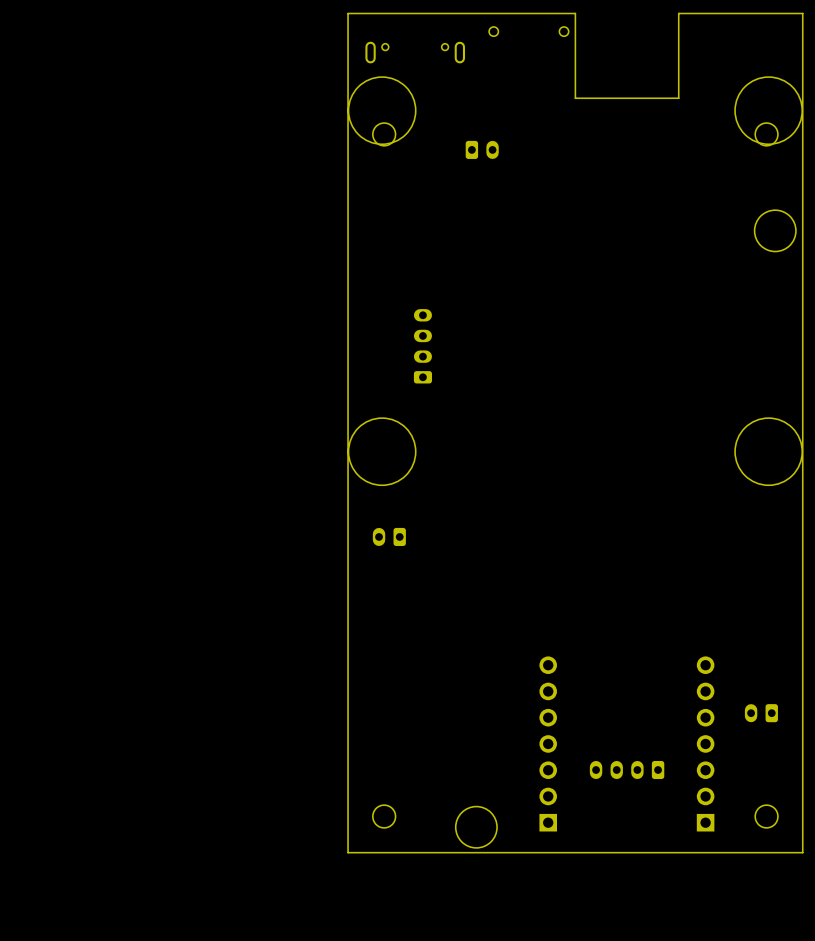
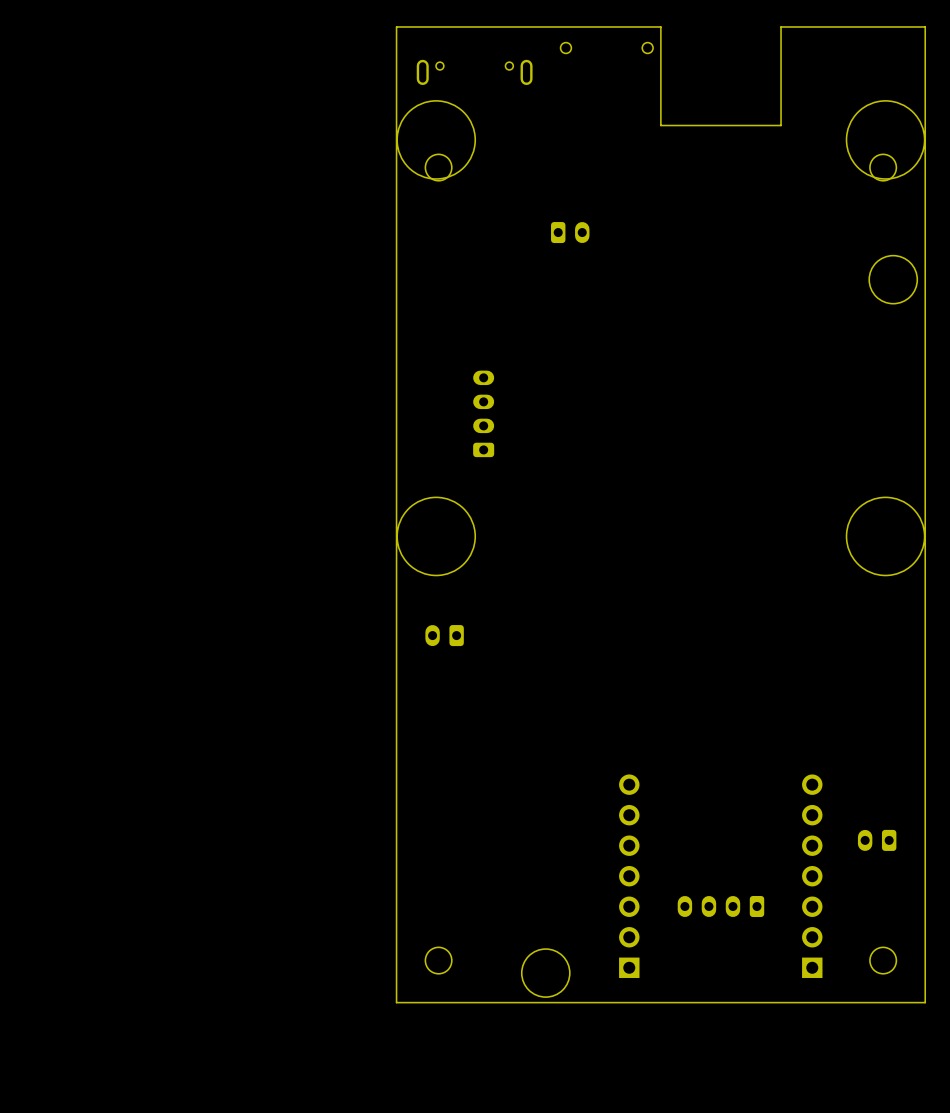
part position: (482, 149) -> (570, 232)

